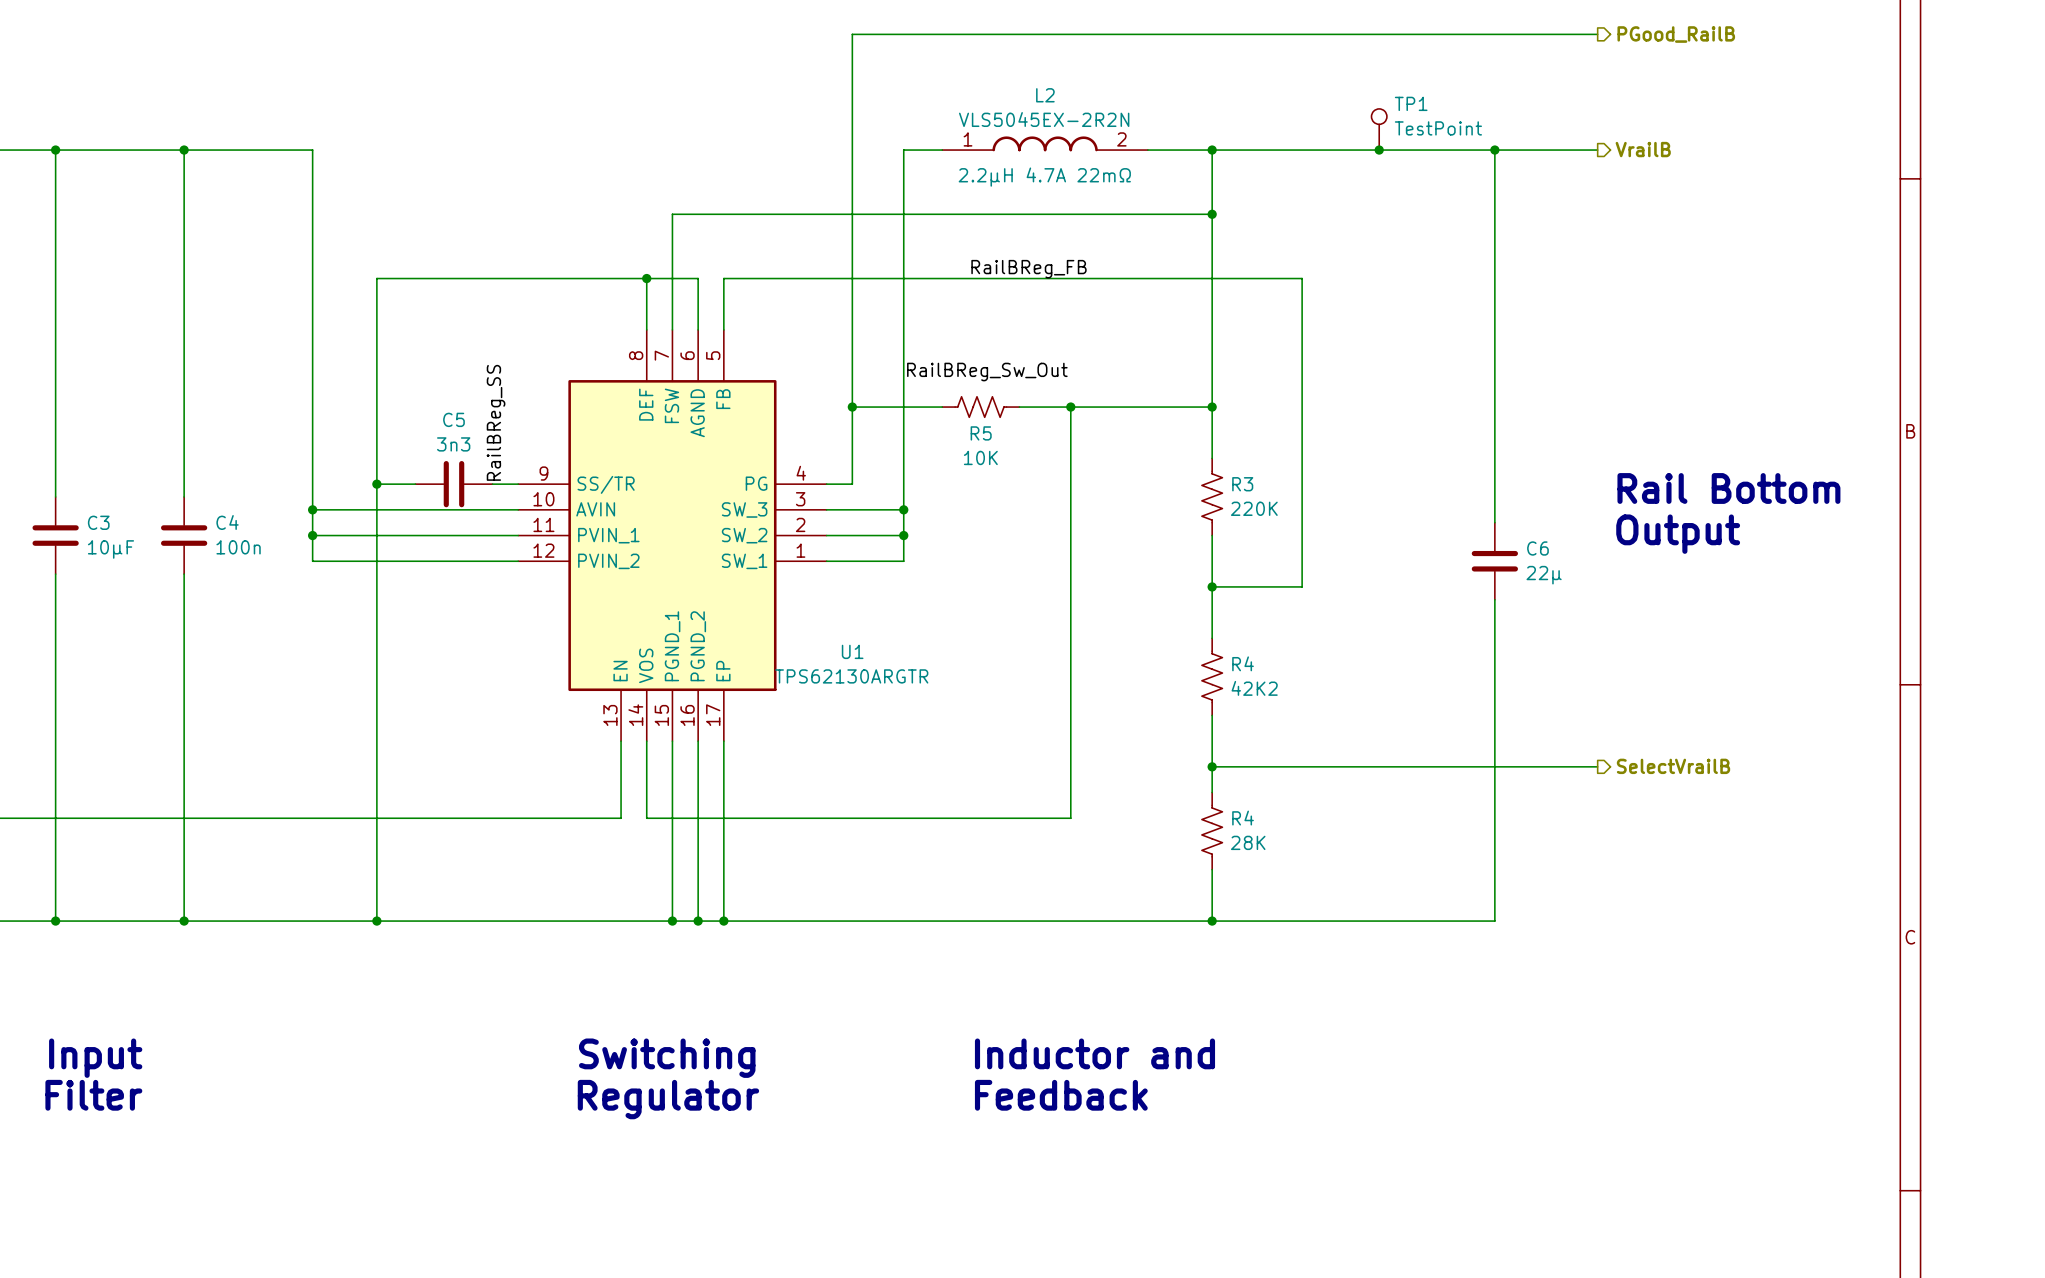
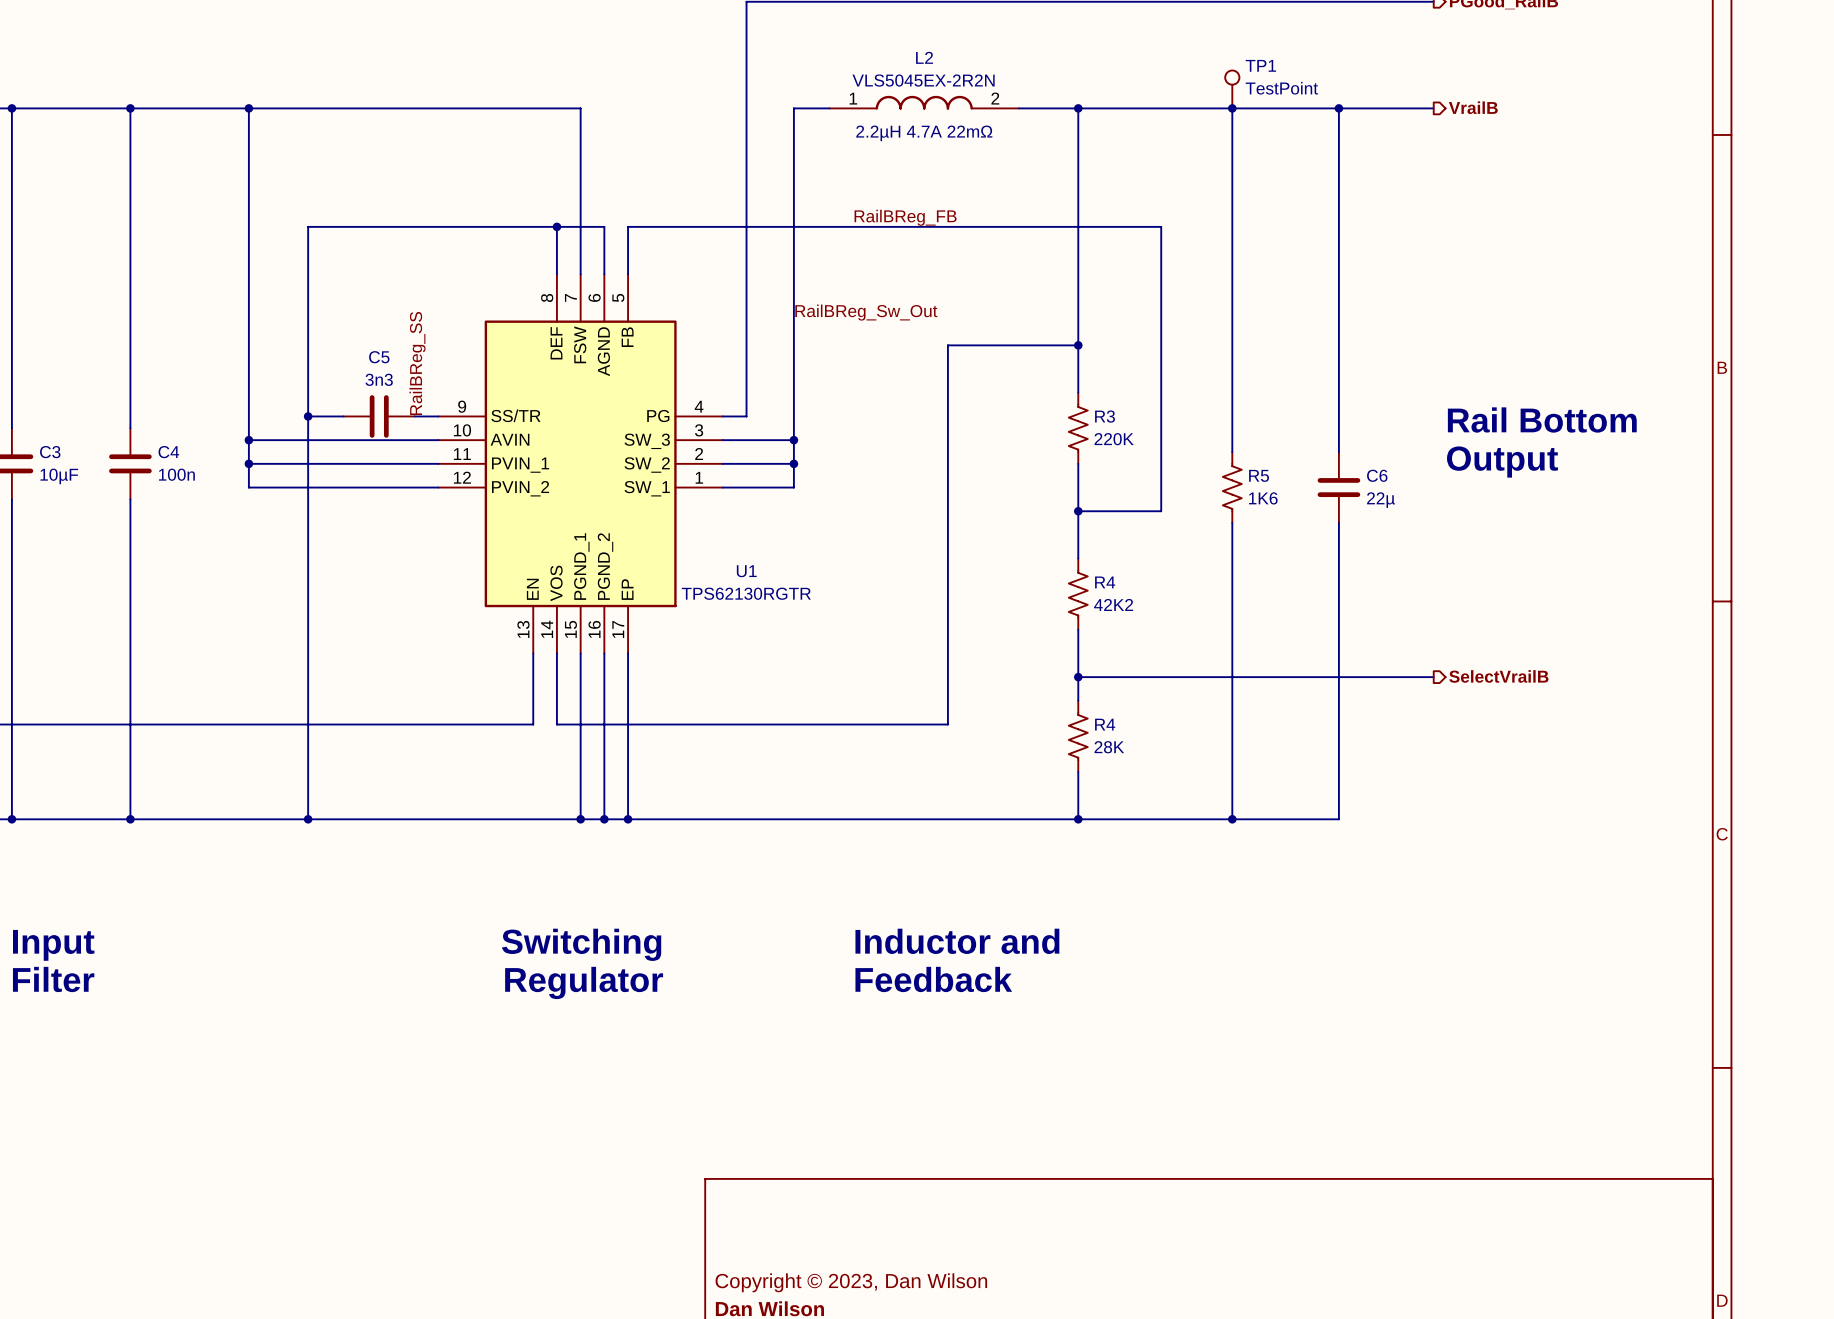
junction: none -> (248, 108)
wire: none -> (1232, 108) (1232, 452)
wire: (672, 214) (1212, 214) -> (580, 167) (580, 108) (248, 108)
junction: (1212, 214) -> none
wire: (852, 407) (942, 407) -> none
junction: (852, 407) -> none
R5 rotation: 0° (980, 407) -> 90° clockwise (1232, 487)
R5 position: (980, 407) -> (1232, 487)
wire: (1019, 407) (1070, 407) -> none
junction: (1070, 407) -> none
R5 name position: R5 (981, 433) -> R5 (1259, 475)
R5 value: 10K (980, 457) -> 1K6 (1263, 498)
wire: none -> (1232, 523) (1232, 819)
U1 value: TPS62130ARGTR (851, 676) -> TPS62130RGTR (746, 593)
junction: none -> (1232, 819)

